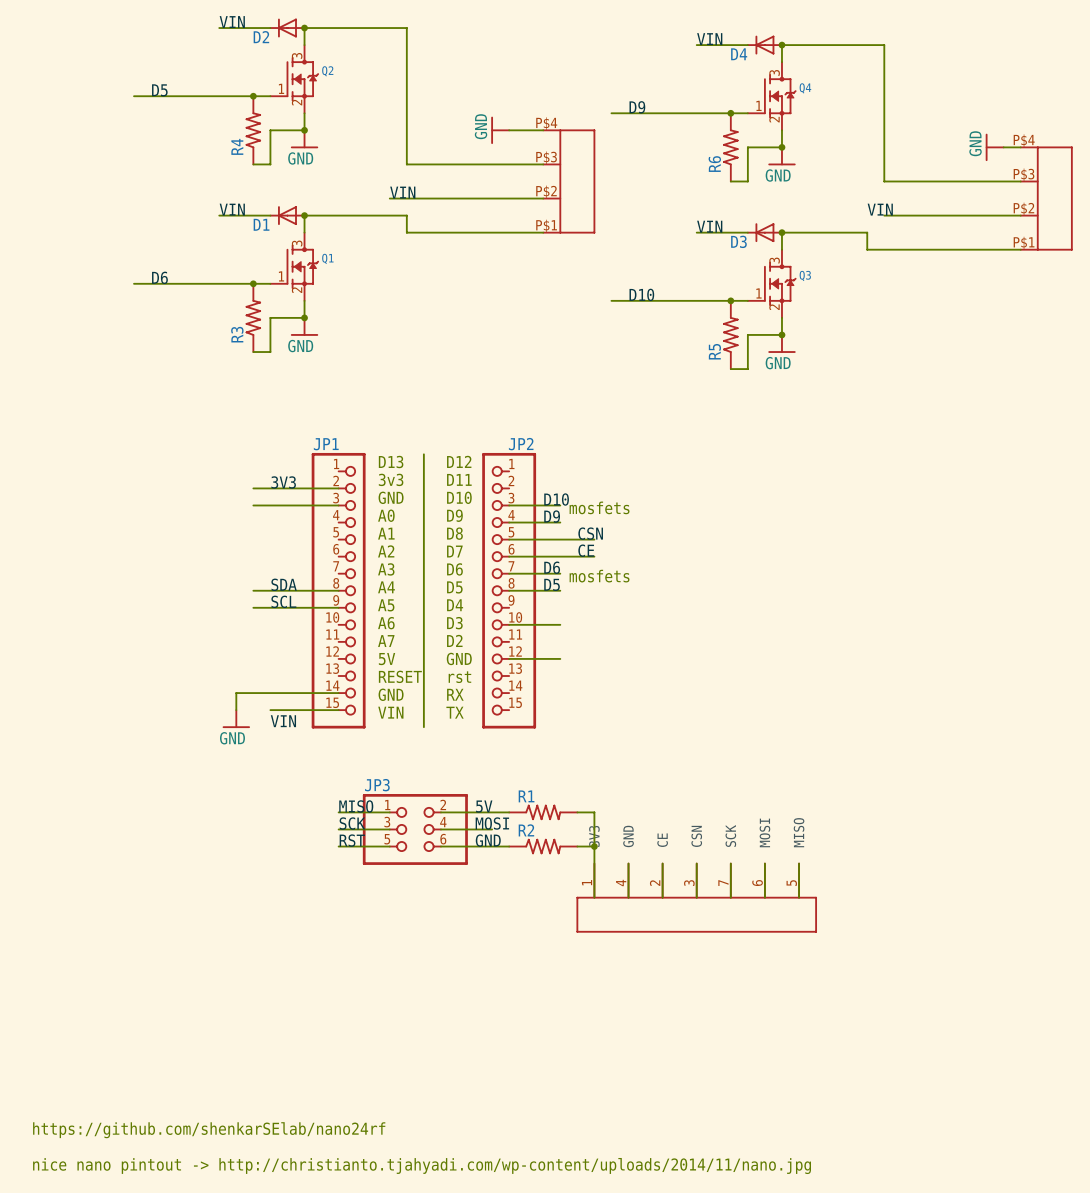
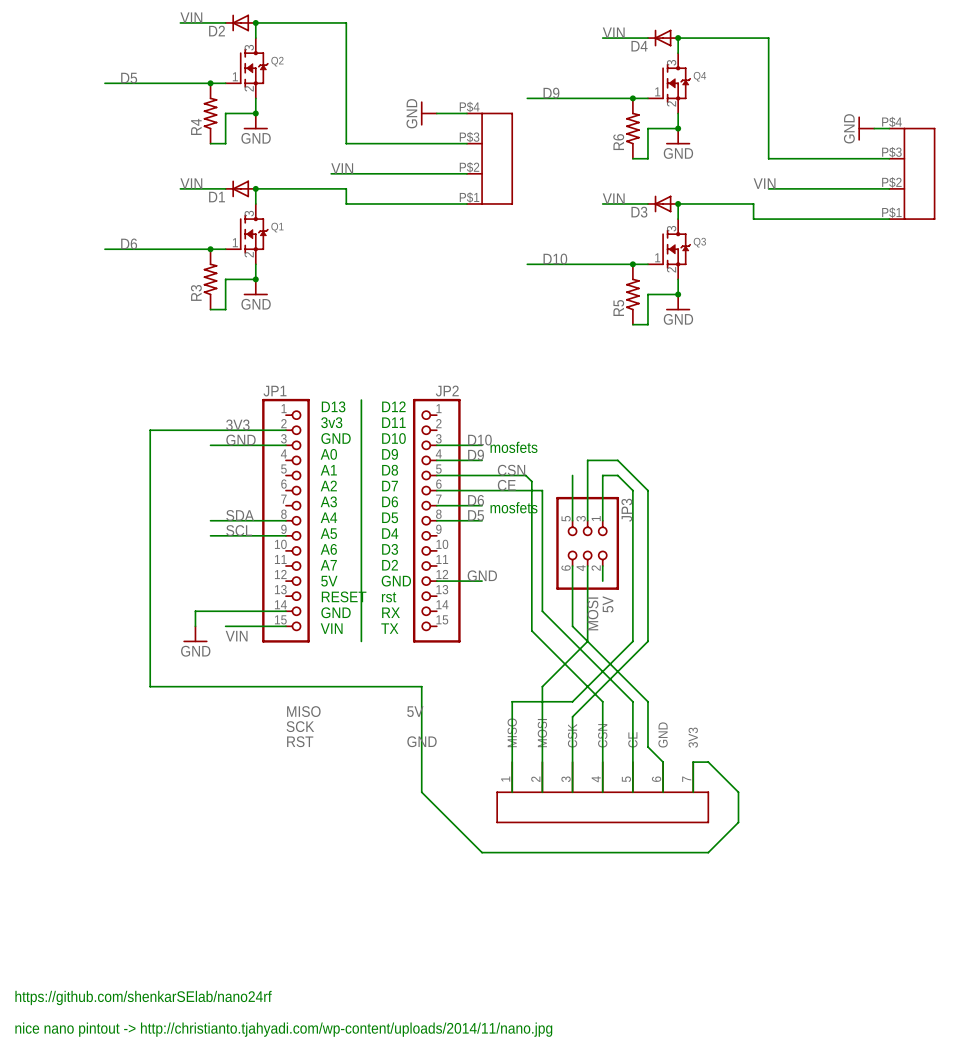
wire: none -> (210, 430) (150, 430) (150, 686) (421, 686) (421, 792) (482, 852) (708, 852) (738, 822) (738, 792) (708, 762) (693, 762)
label: none -> GND (240, 440)
wire: none -> (512, 475) (525, 475) (531, 481) (531, 630) (602, 701) (602, 762)
wire: none -> (572, 475) (572, 520)
wire: none -> (512, 490) (542, 490) (542, 611) (632, 701) (632, 762)
wire: none -> (587, 520) (587, 460) (617, 460) (647, 490) (647, 641) (572, 716) (572, 762)
wire: (509, 624) (560, 624) -> none
wire: none -> (572, 566) (572, 626) (647, 701) (647, 747) (663, 762)
wire: none -> (587, 566) (587, 641) (542, 686) (542, 762)
wire: none -> (602, 566) (602, 581)
label: none -> GND (482, 575)
label: none -> 5V (608, 604)
label: none -> MOSI (592, 613)
wire: (338, 812) (389, 812) -> none
wire: (440, 812) (509, 812) -> none
R1: (543, 812) -> none
wire: (577, 812) (594, 812) -> (602, 520) (602, 475) (617, 475) (632, 490) (632, 641) (572, 701) (512, 701) (512, 716)
label: MOSI (492, 823) -> none
wire: (338, 829) (389, 829) -> none
JP3 rotation: 0° (415, 829) -> 90° clockwise (587, 543)
JP3 position: (415, 829) -> (587, 543)
wire: (440, 829) (492, 829) -> none
wire: (338, 846) (389, 846) -> none
wire: (440, 846) (509, 846) -> none
R2: (543, 846) -> none
wire: (577, 846) (594, 846) -> none
junction: (594, 846) -> none
part symbol: [576, 863, 817, 933] -> [496, 762, 710, 824]

